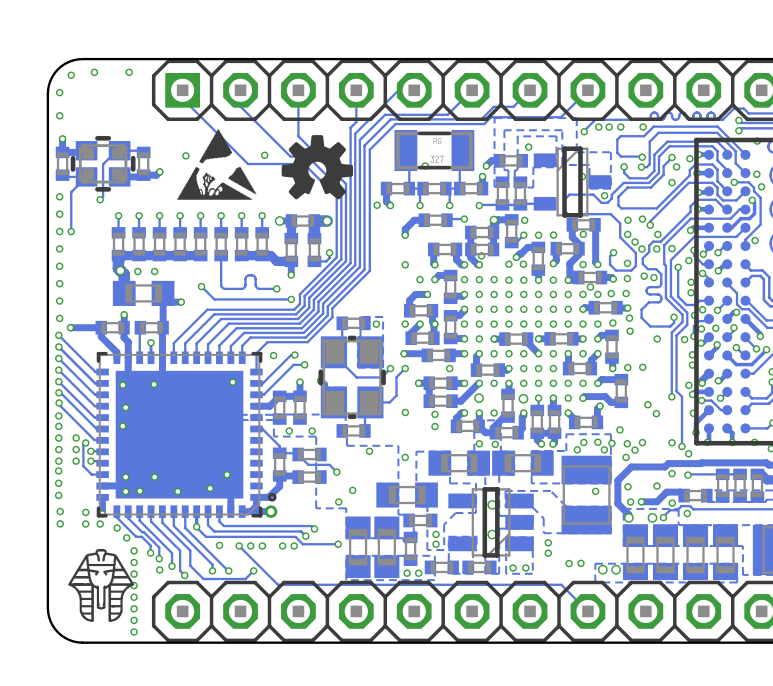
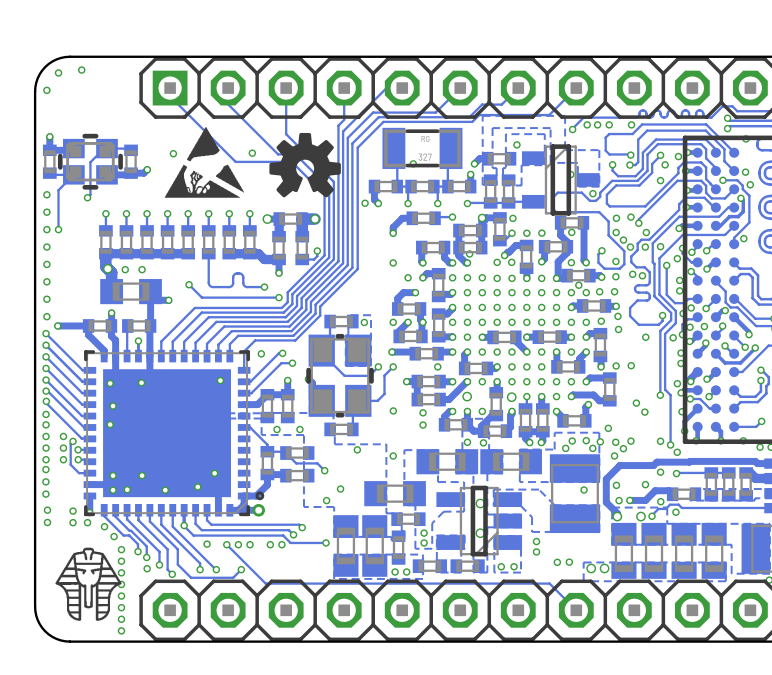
via: (129, 72) -> none
via: (59, 115) -> none

